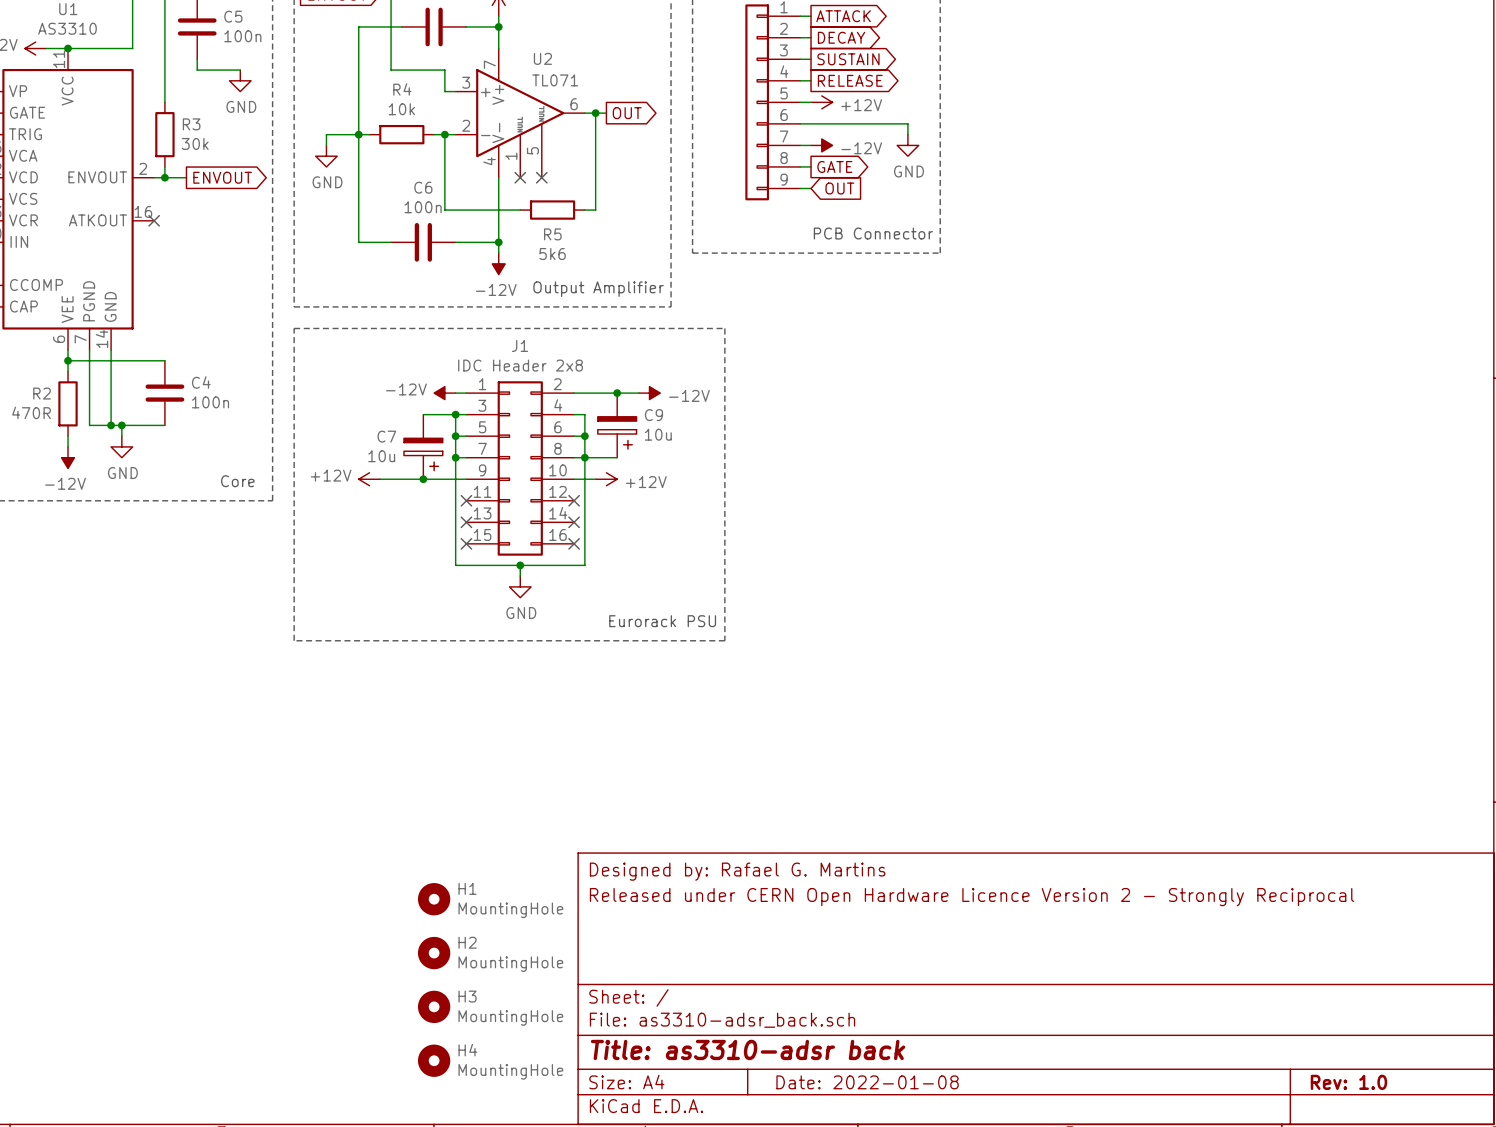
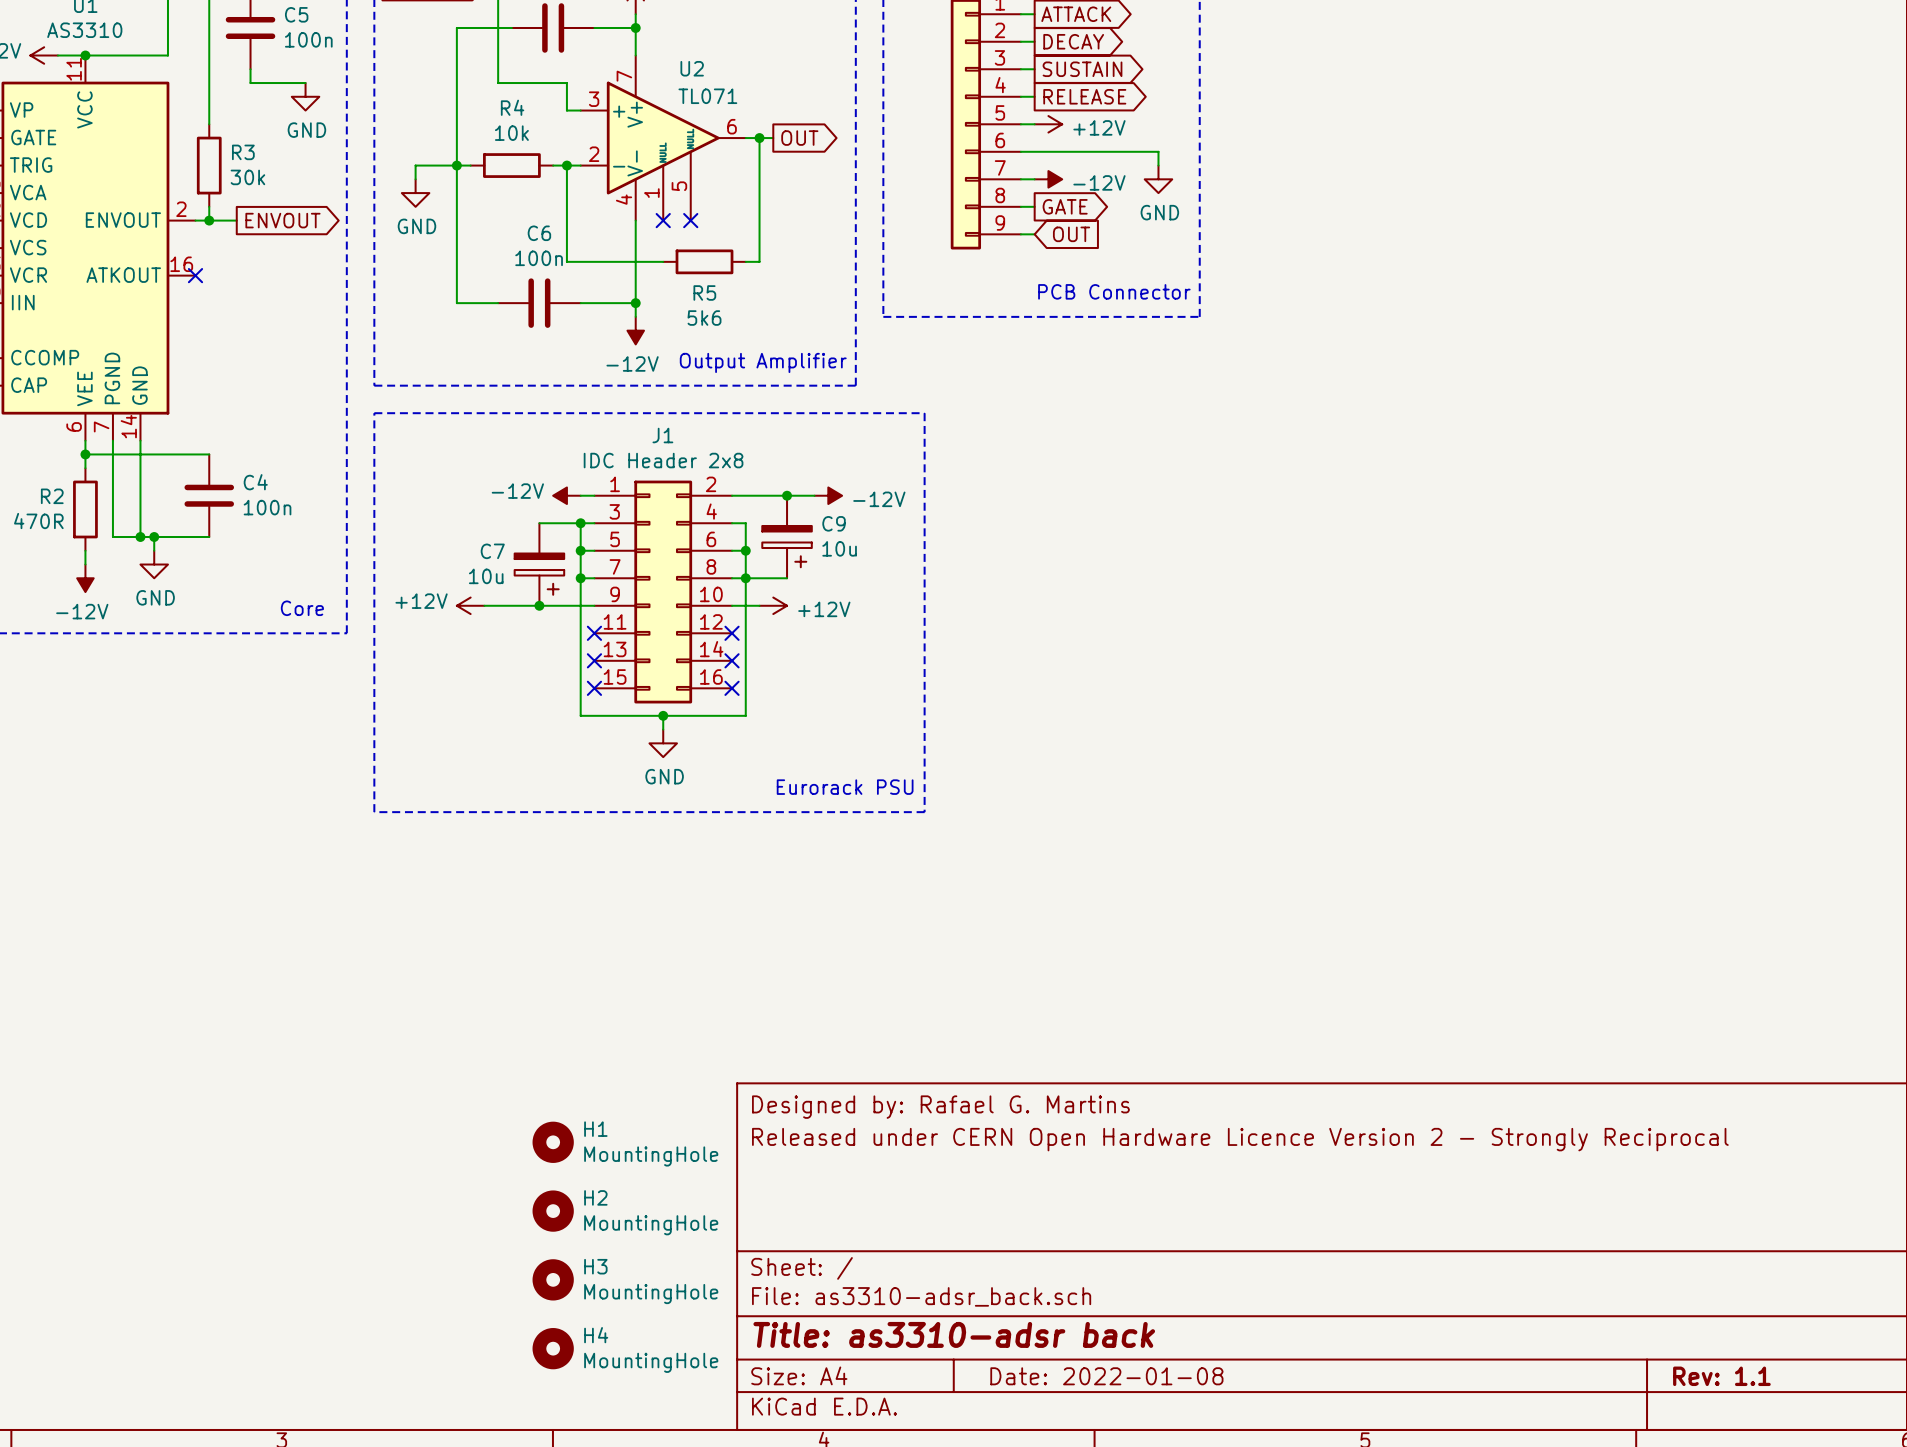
title block: Rev: 1.0 (1348, 1082) -> Rev: 1.1 (1721, 1376)

